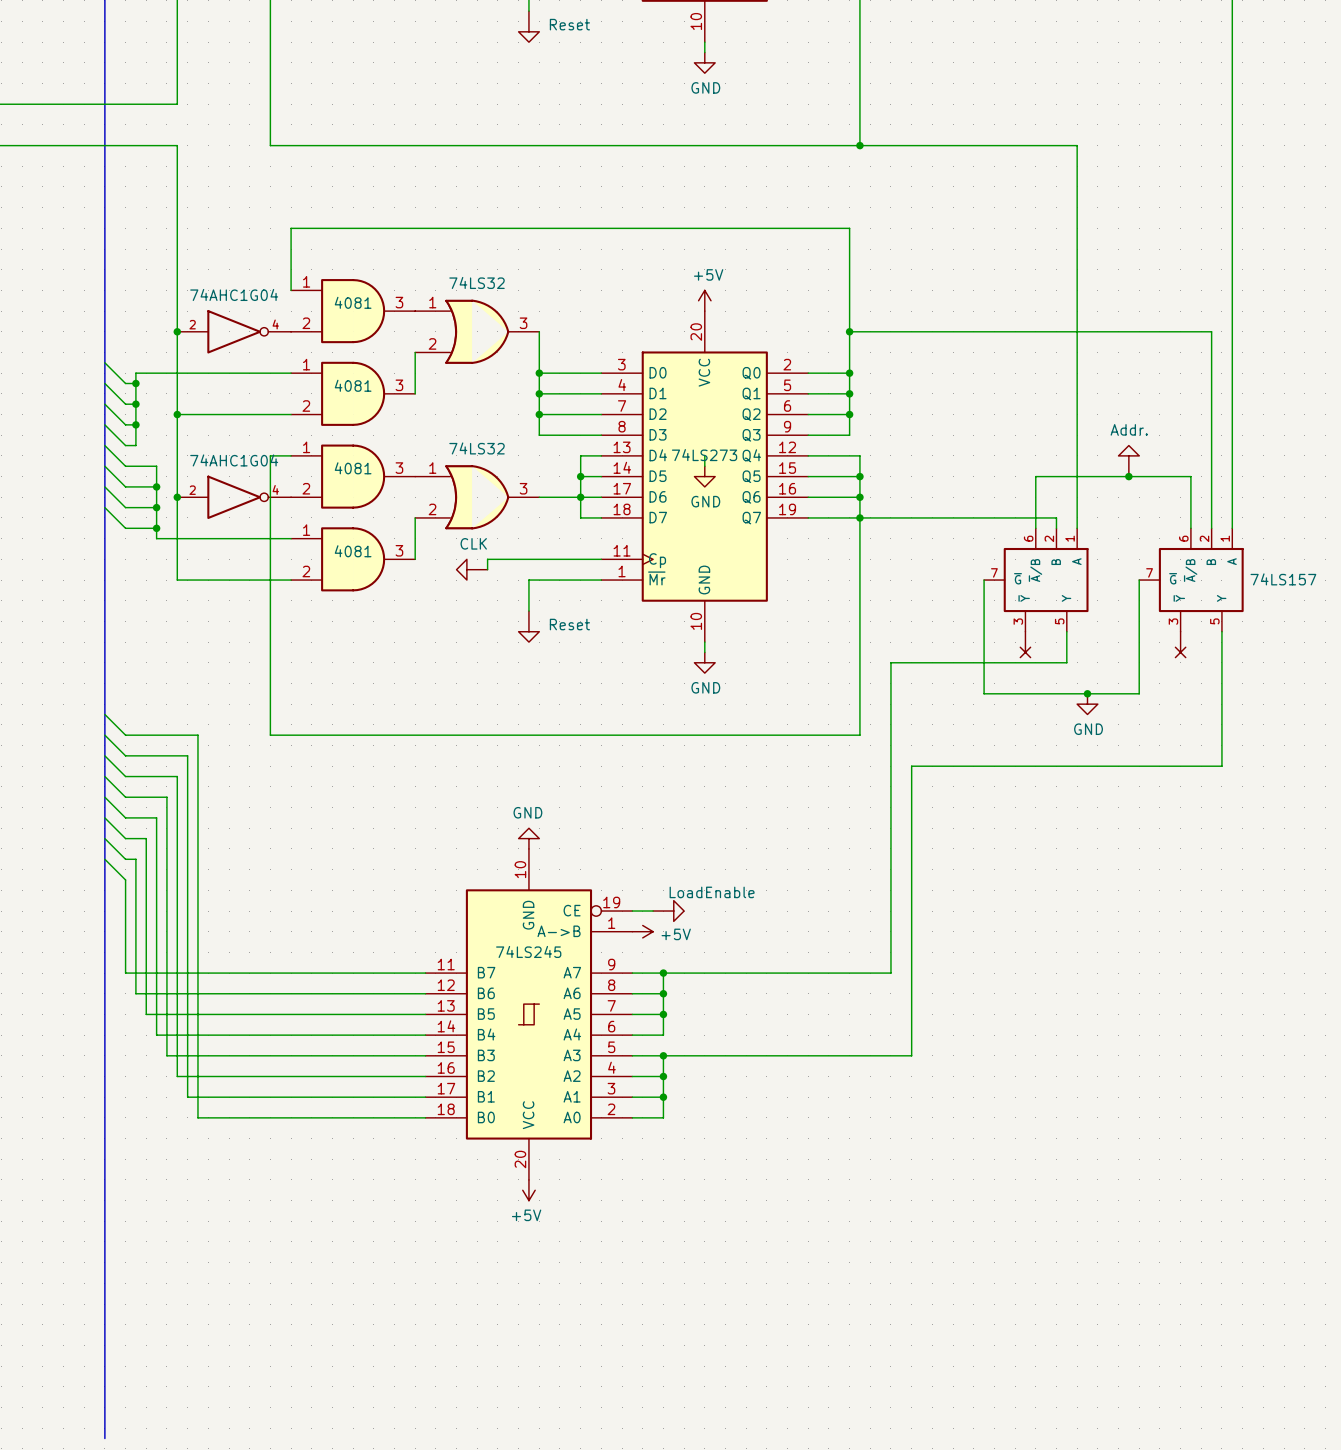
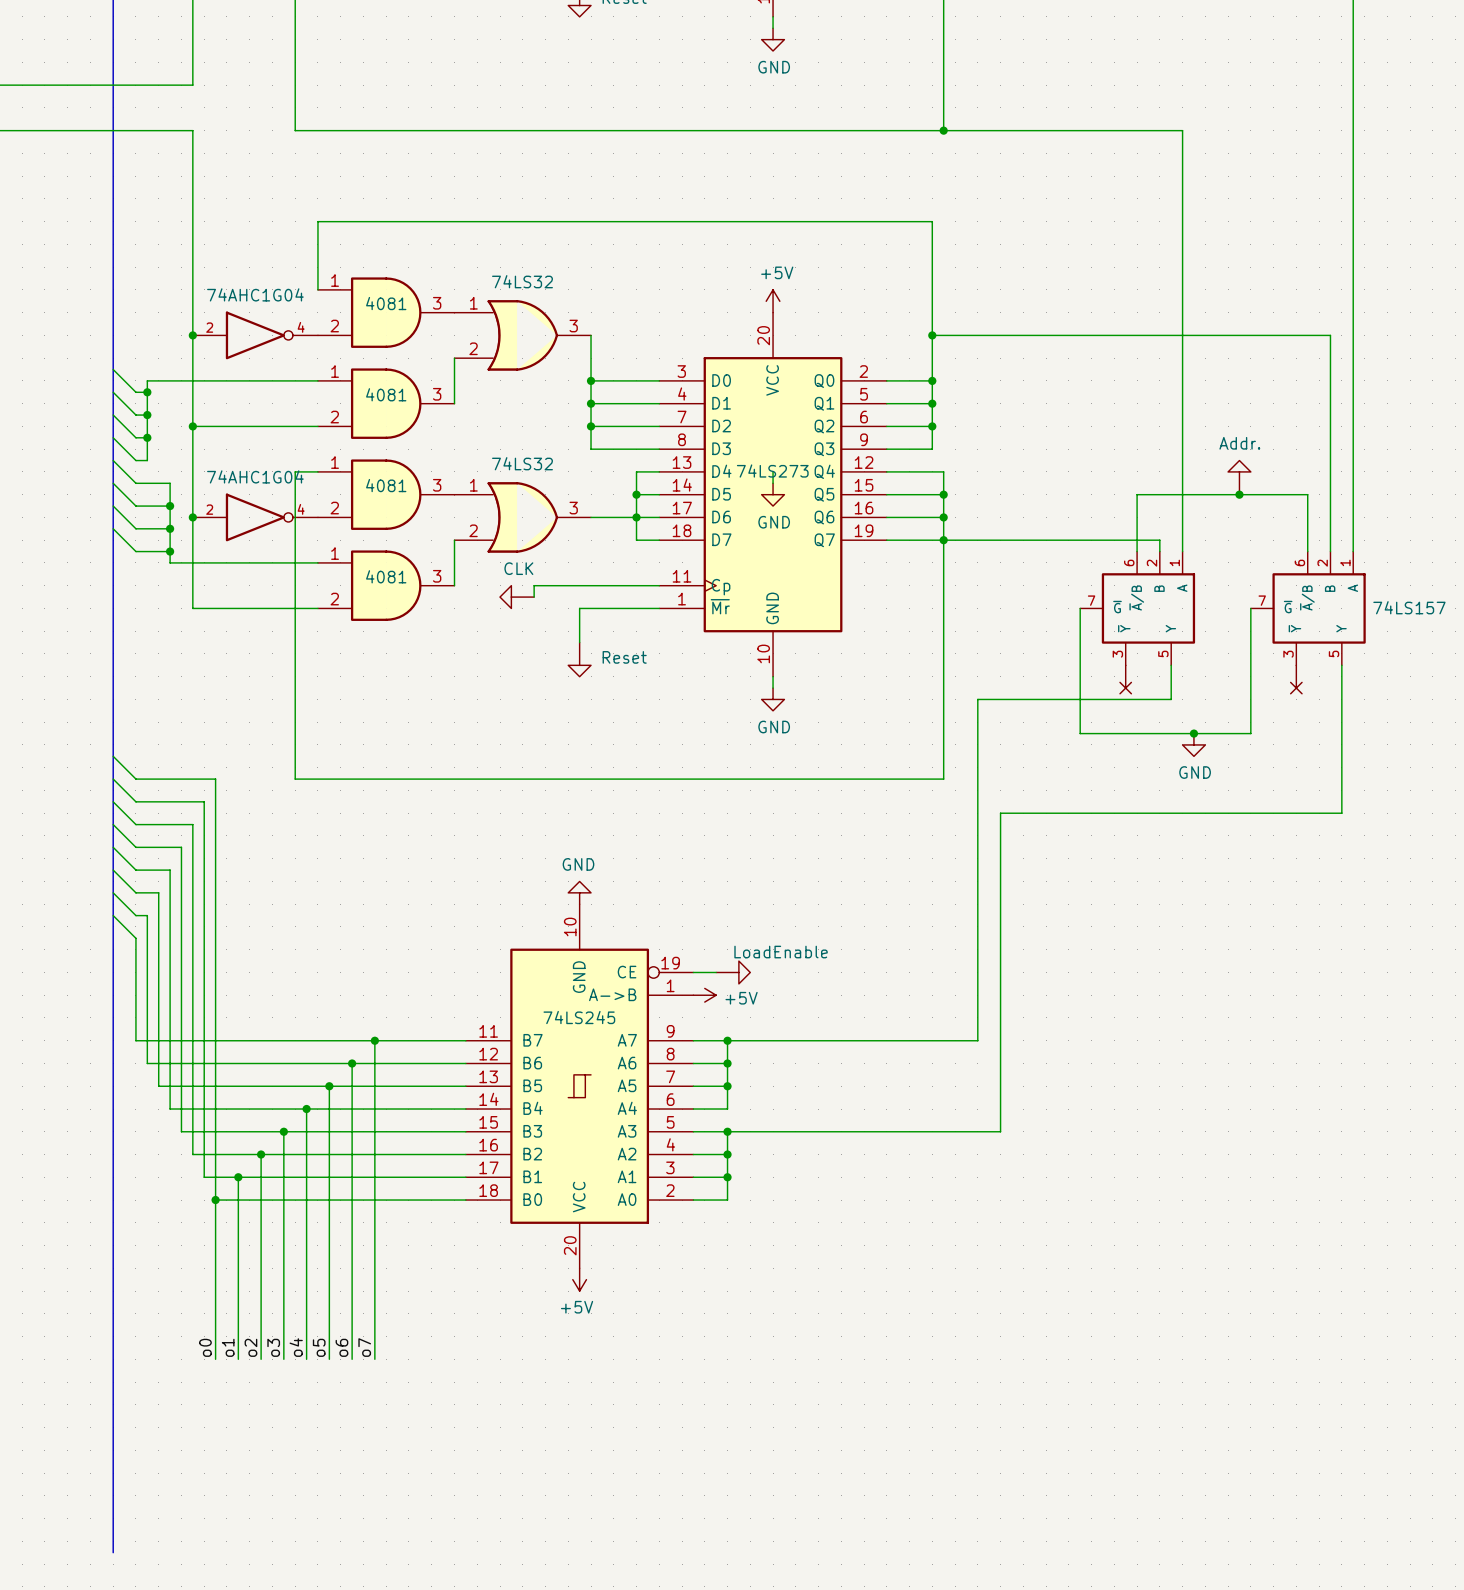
wire: none -> (374, 1040) (374, 1359)
junction: none -> (374, 1040)
wire: none -> (352, 1063) (352, 1359)
junction: none -> (352, 1063)
wire: none -> (329, 1086) (329, 1359)
junction: none -> (329, 1086)
wire: none -> (306, 1109) (306, 1359)
junction: none -> (306, 1109)
wire: none -> (283, 1131) (283, 1359)
junction: none -> (283, 1131)
wire: none -> (261, 1154) (261, 1359)
junction: none -> (261, 1154)
wire: none -> (238, 1177) (238, 1359)
junction: none -> (238, 1177)
wire: none -> (215, 1200) (215, 1359)
junction: none -> (215, 1200)
label: none -> o0 (205, 1347)
label: none -> o1 (228, 1347)
label: none -> o2 (250, 1347)
label: none -> o3 (273, 1347)
label: none -> o4 (296, 1347)
label: none -> o5 (319, 1347)
label: none -> o6 (341, 1347)
label: none -> o7 (364, 1347)

